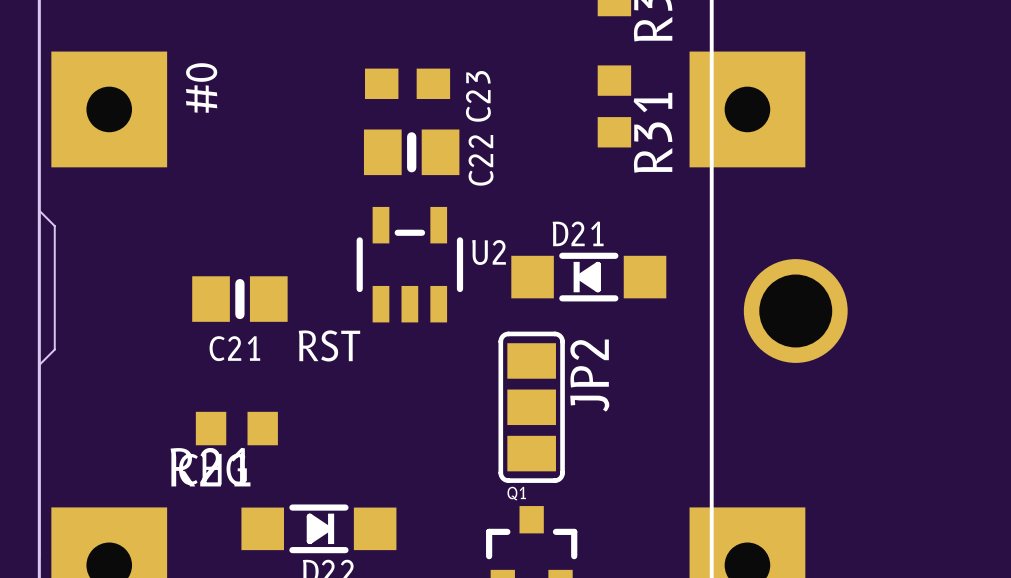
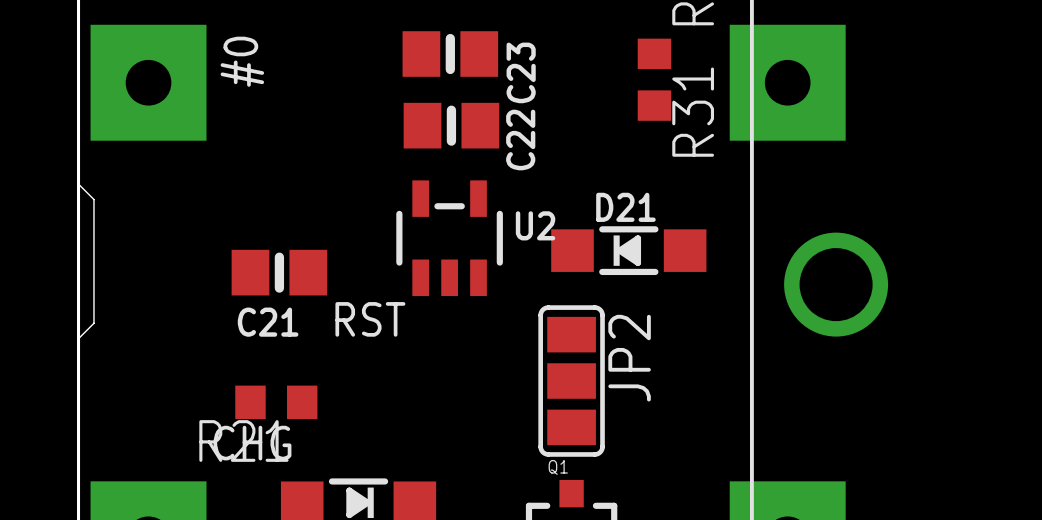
C23 footprint: [365, 68, 451, 99] -> [402, 31, 499, 77]

